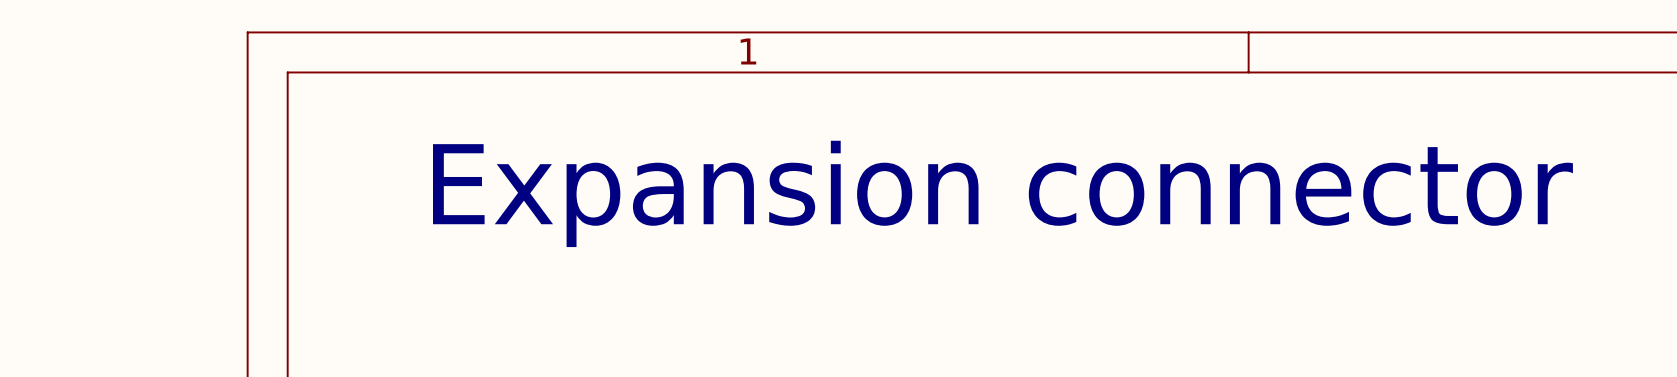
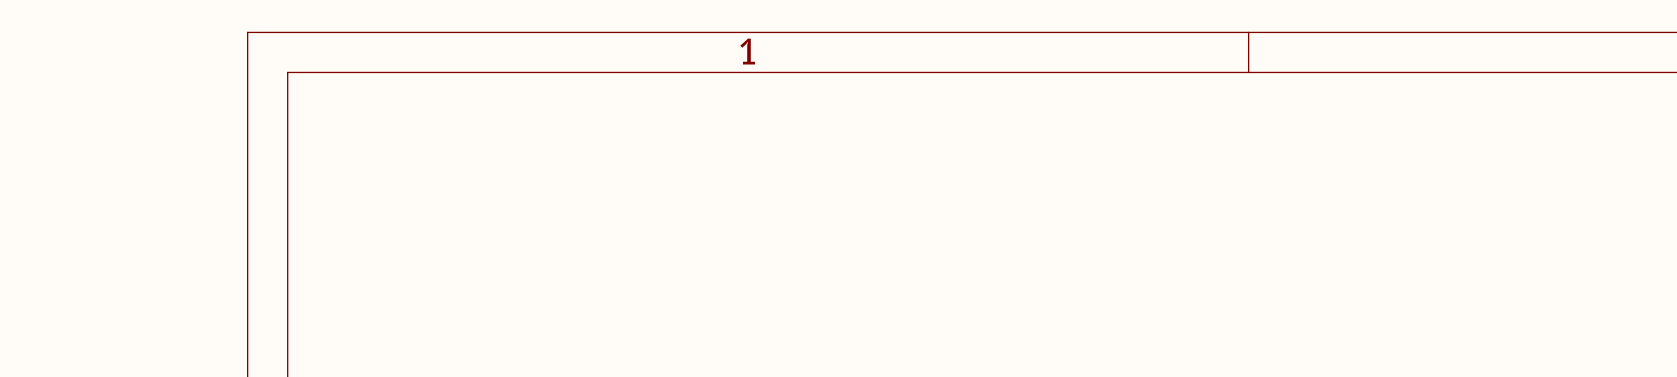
text: Expansion connector (1002, 193) -> none

